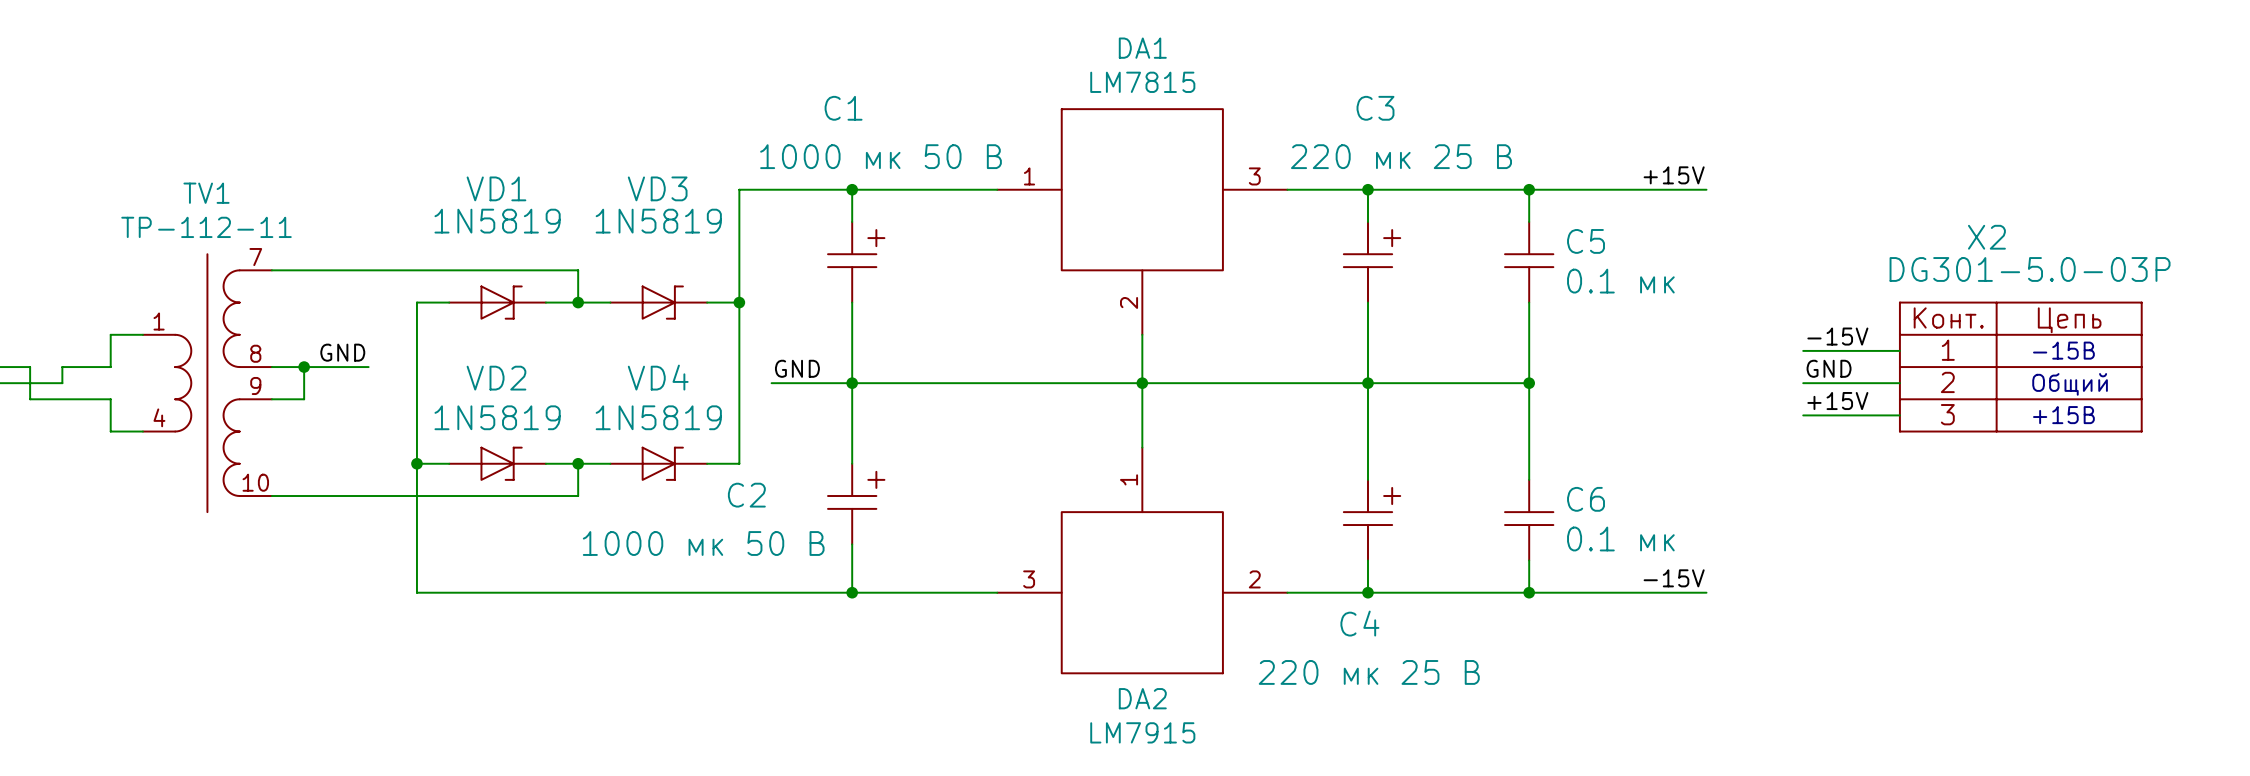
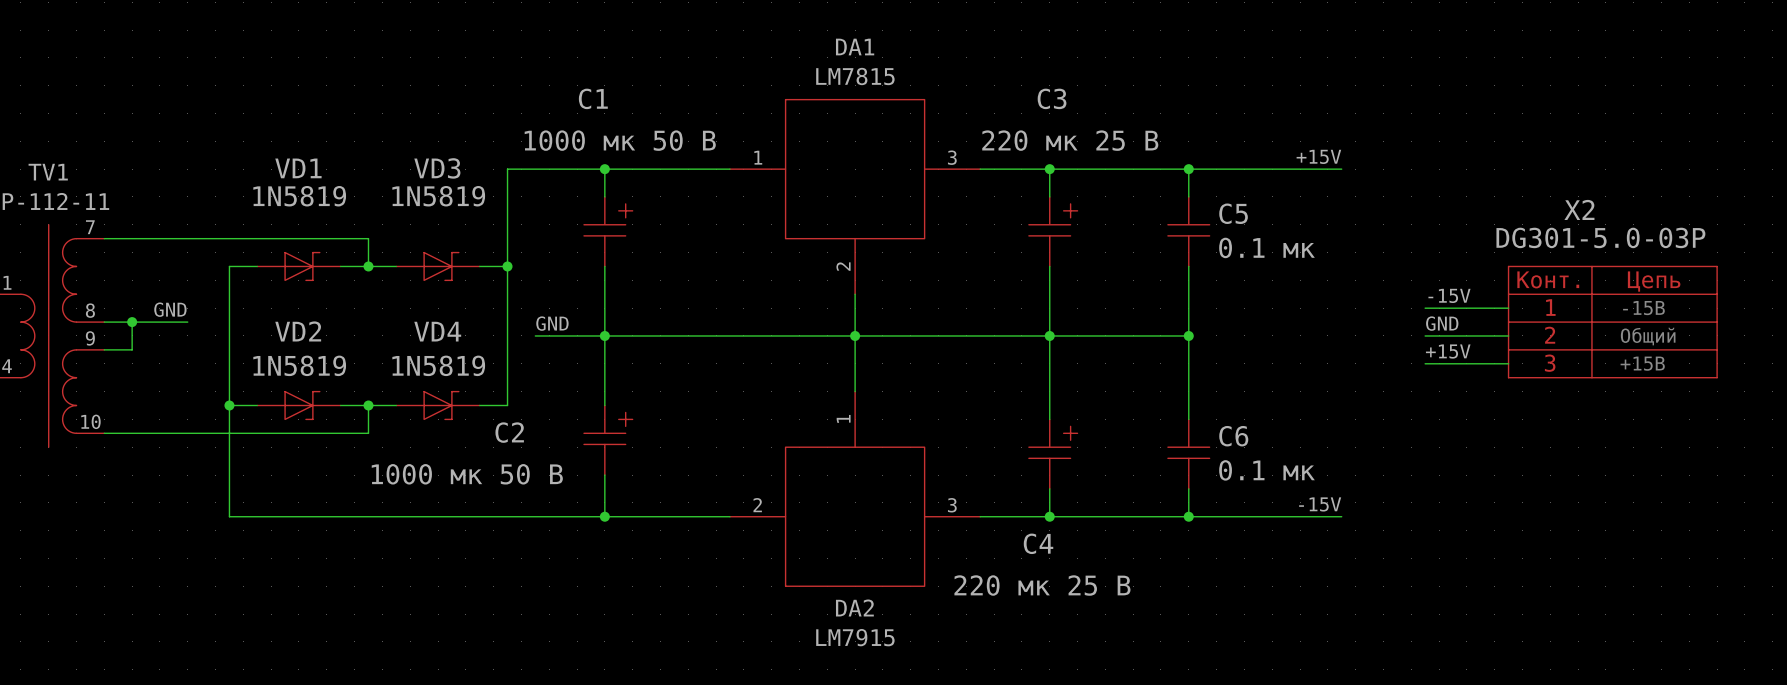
DA2 flip: as is (1142, 592) -> left-right (855, 516)

